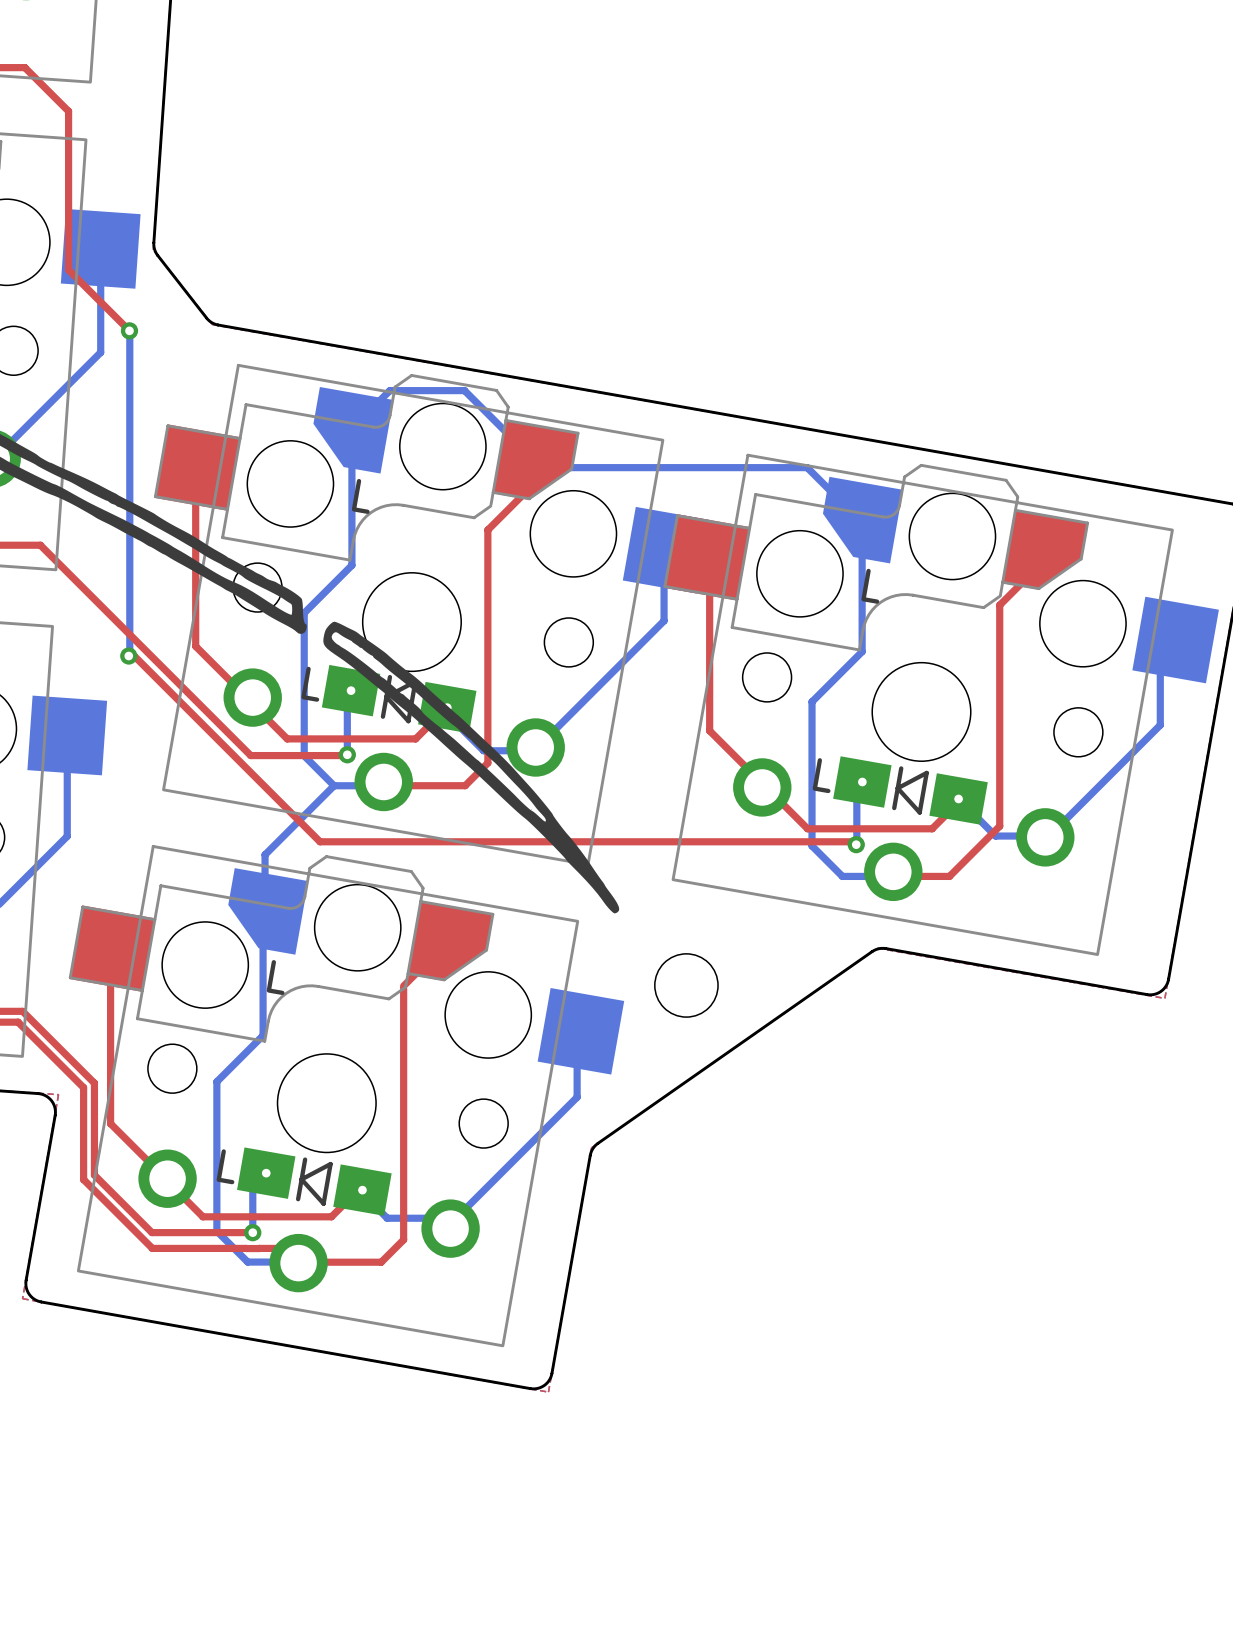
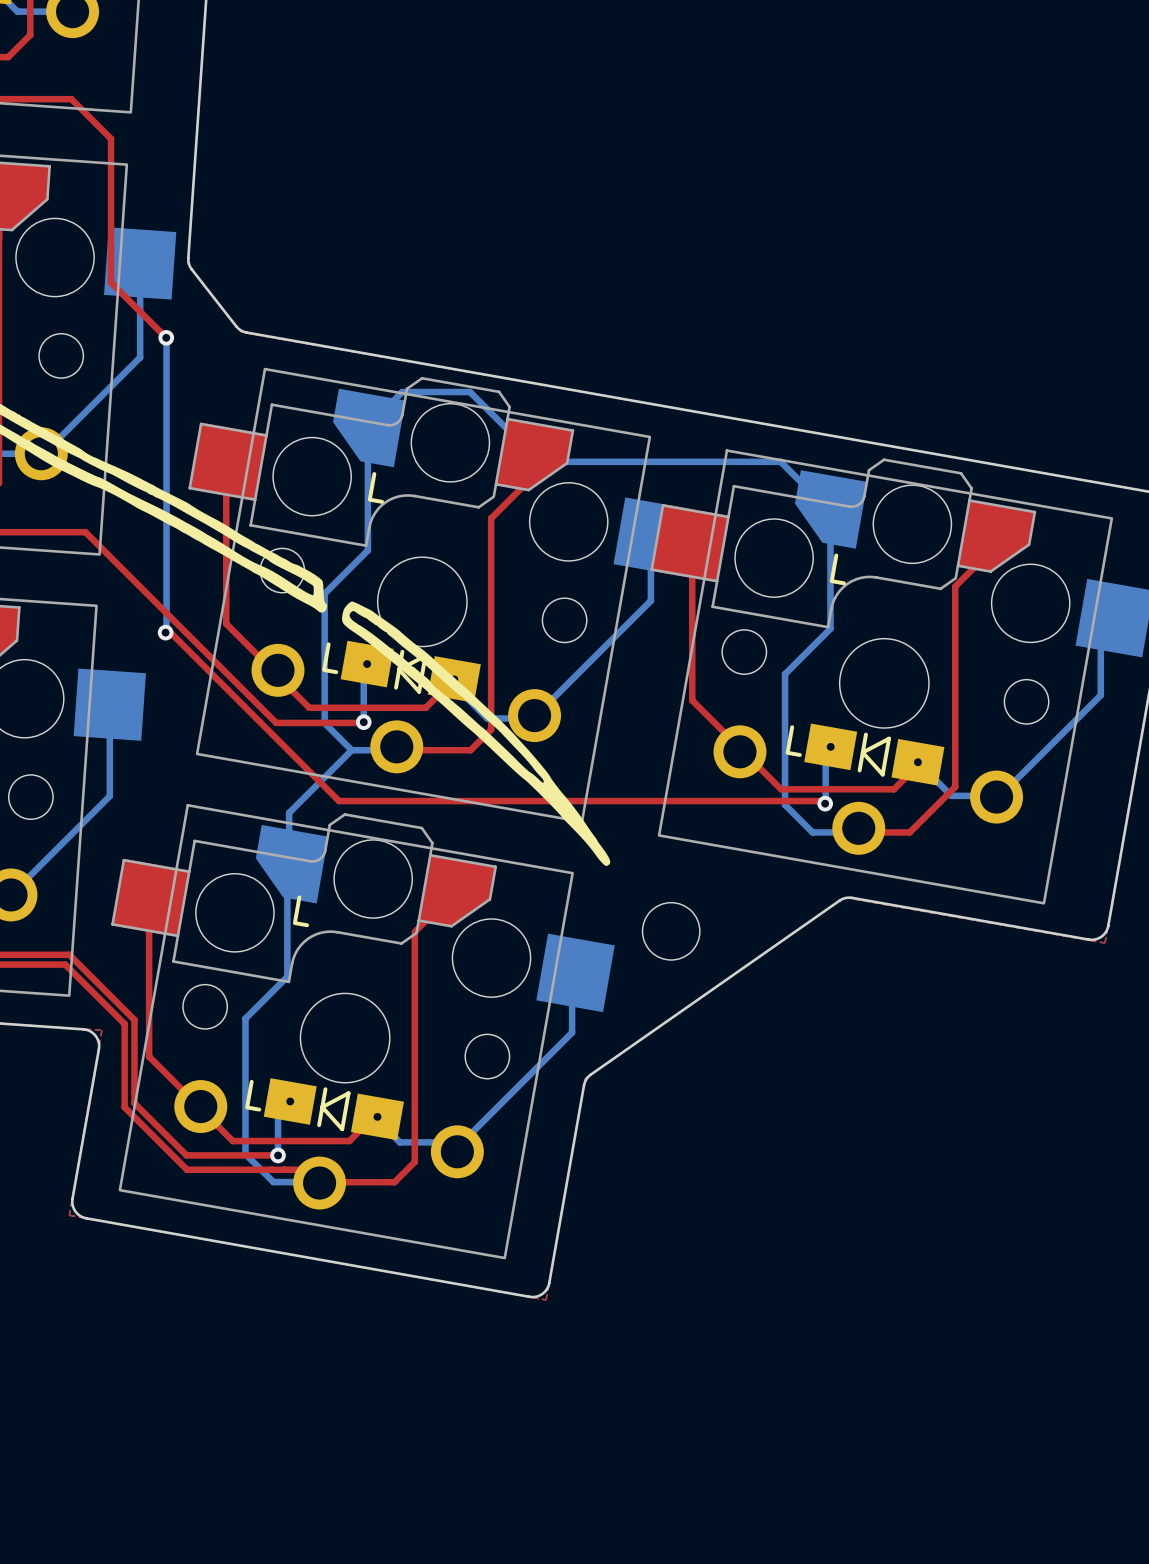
part text position: L (275, 977) -> L (300, 911)

